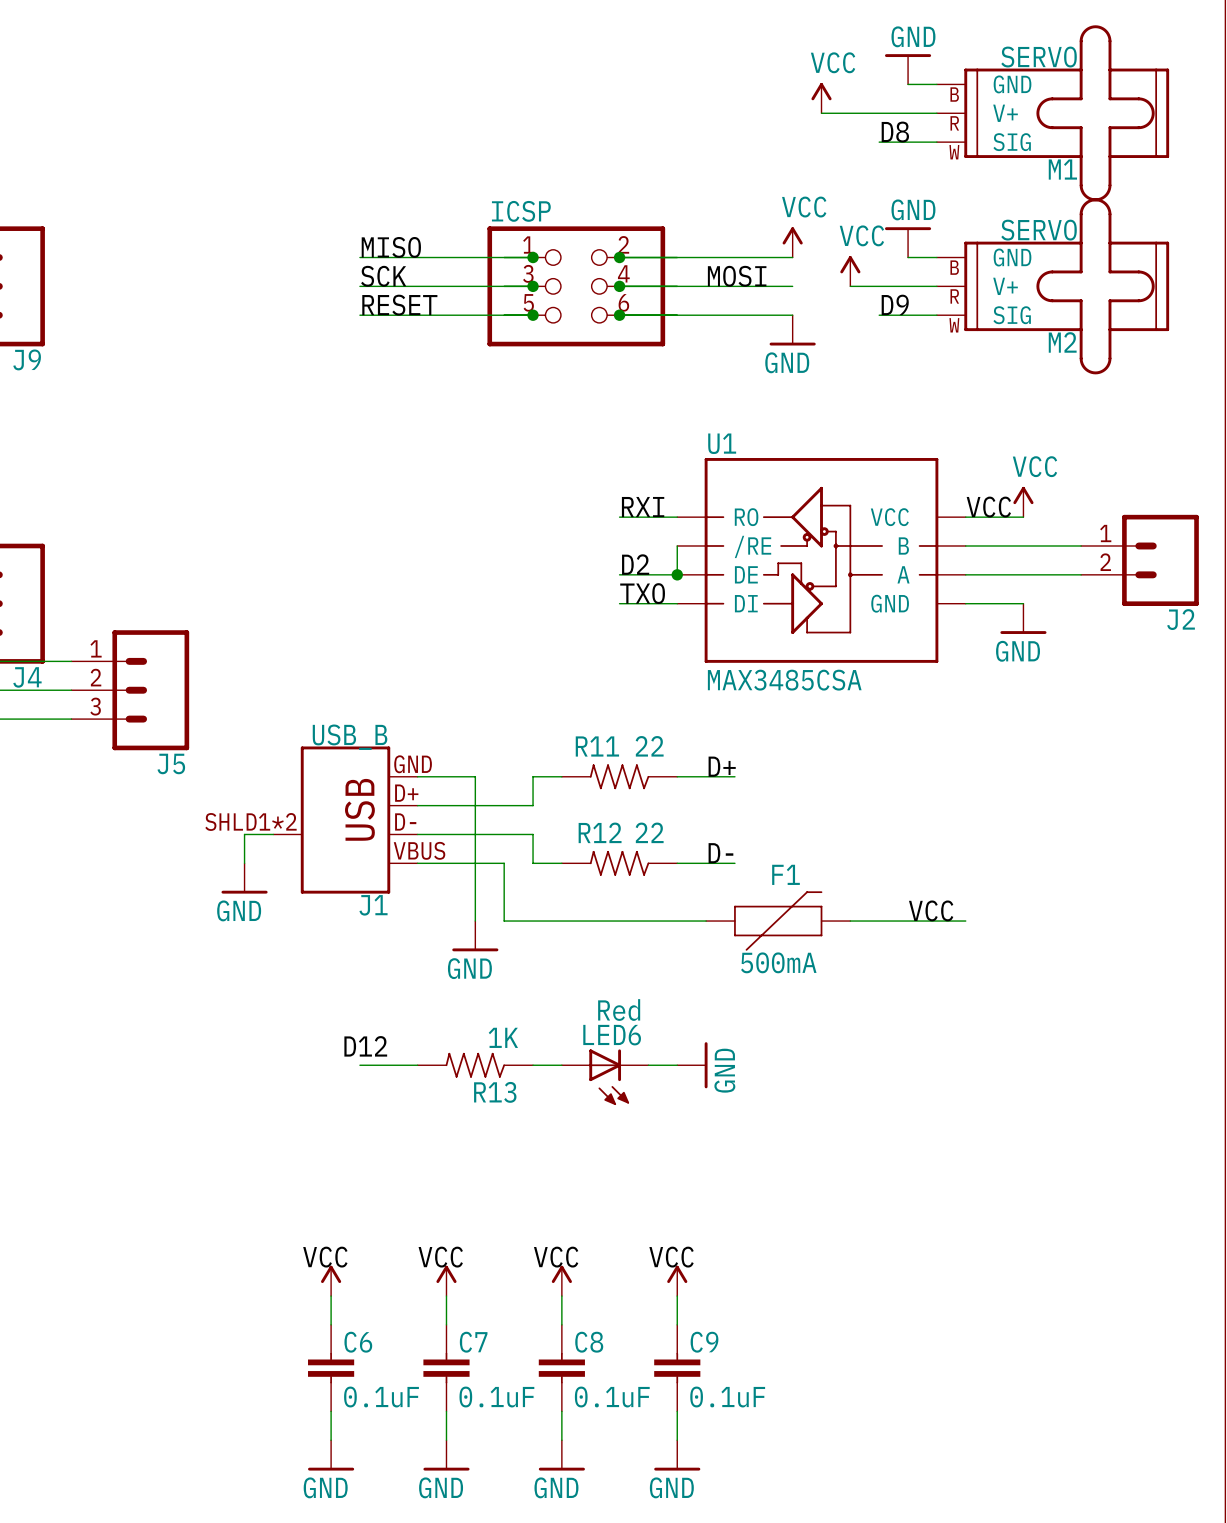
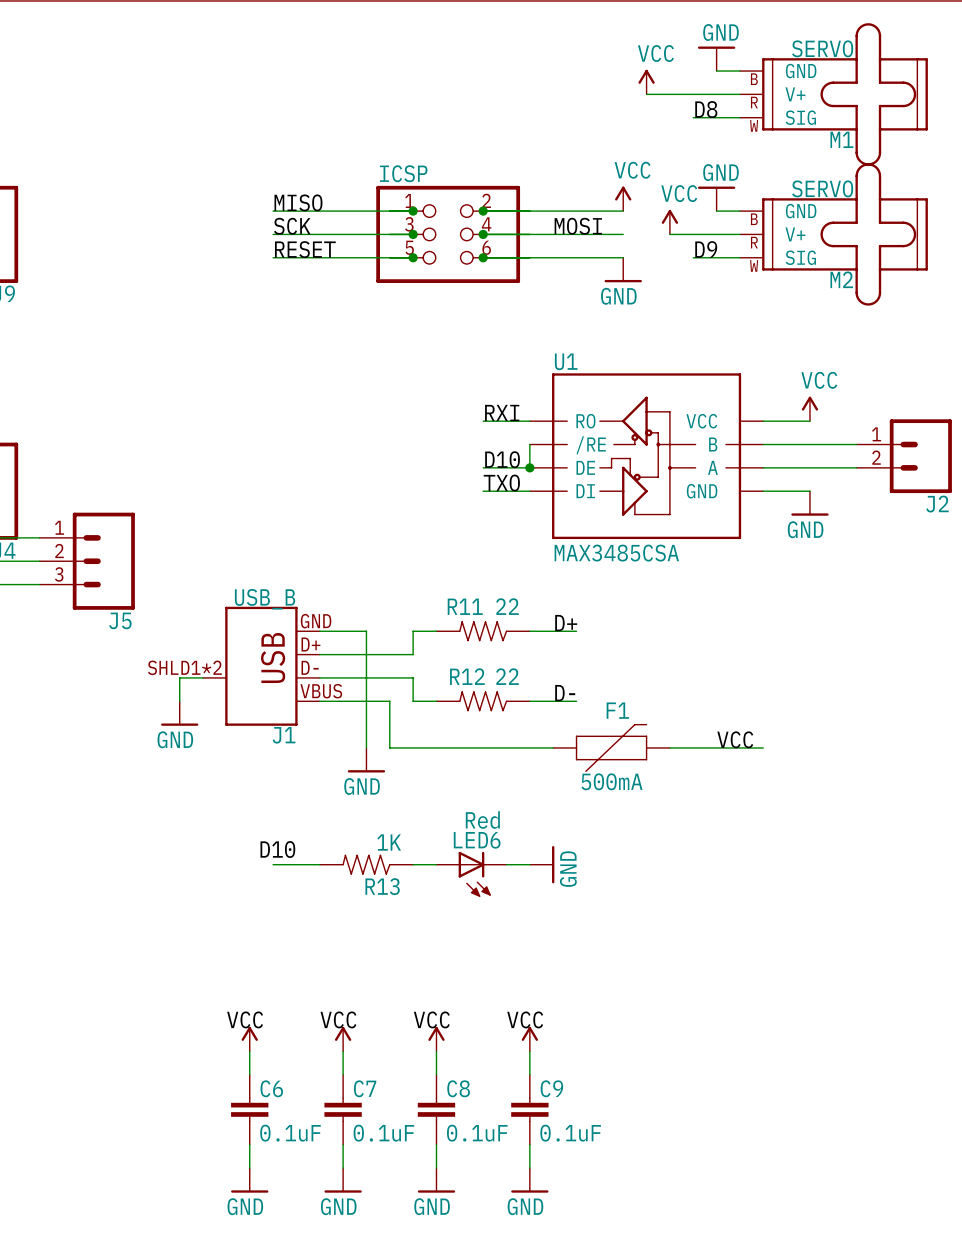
label: VCC (988, 507) -> none
label: D2 (635, 564) -> D10 (502, 459)
label: D12 (365, 1046) -> D10 (277, 849)

